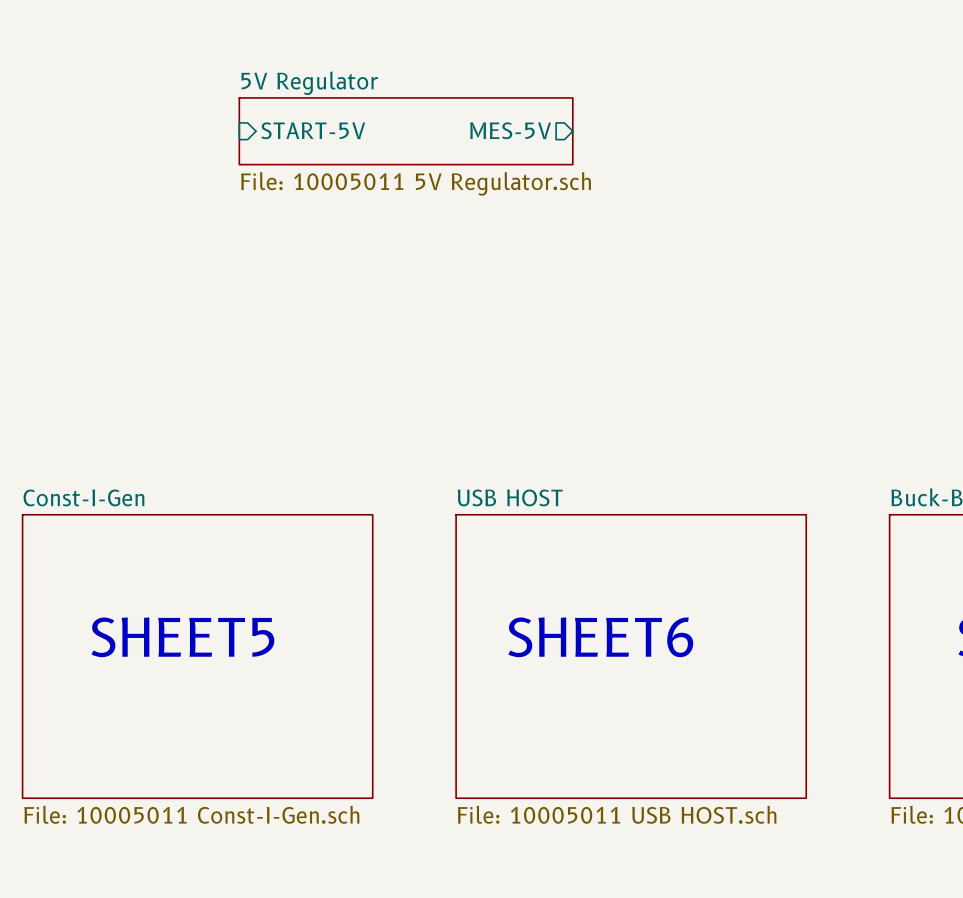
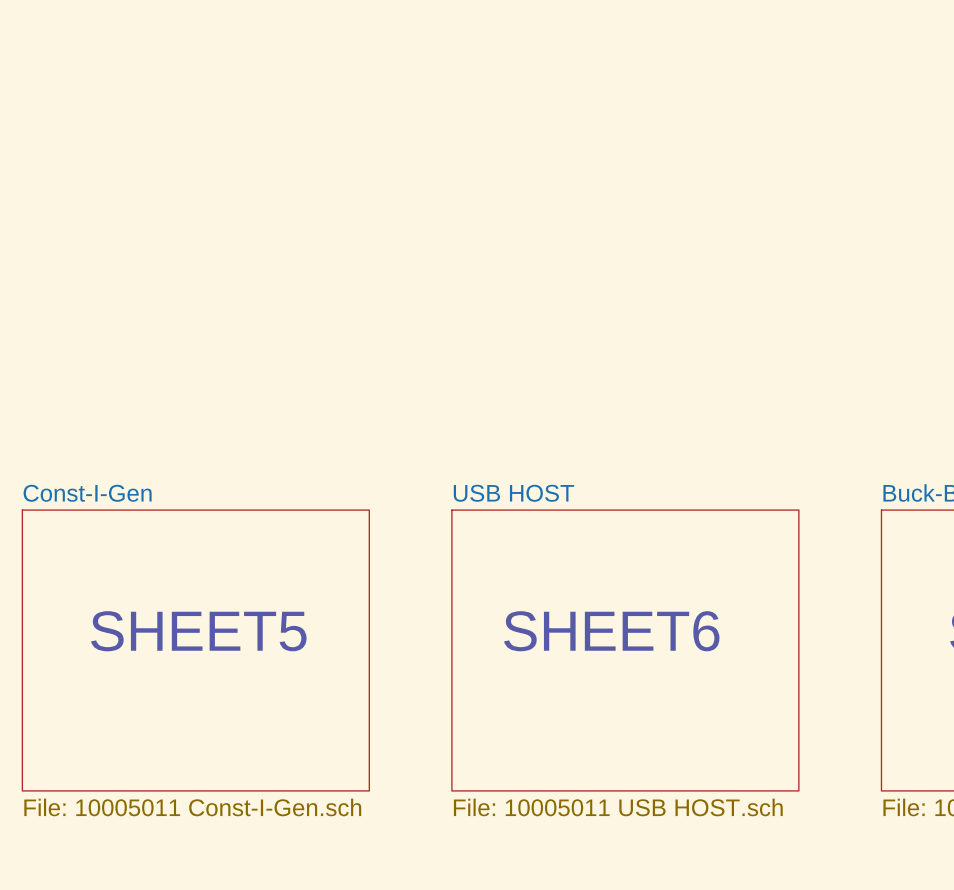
sheet pin: START-5V (313, 130) -> none
sheet pin: MES-5V (510, 130) -> none
sheet 5V Regulator: File: 10005011 5V Regulator.sch (406, 131) -> none

